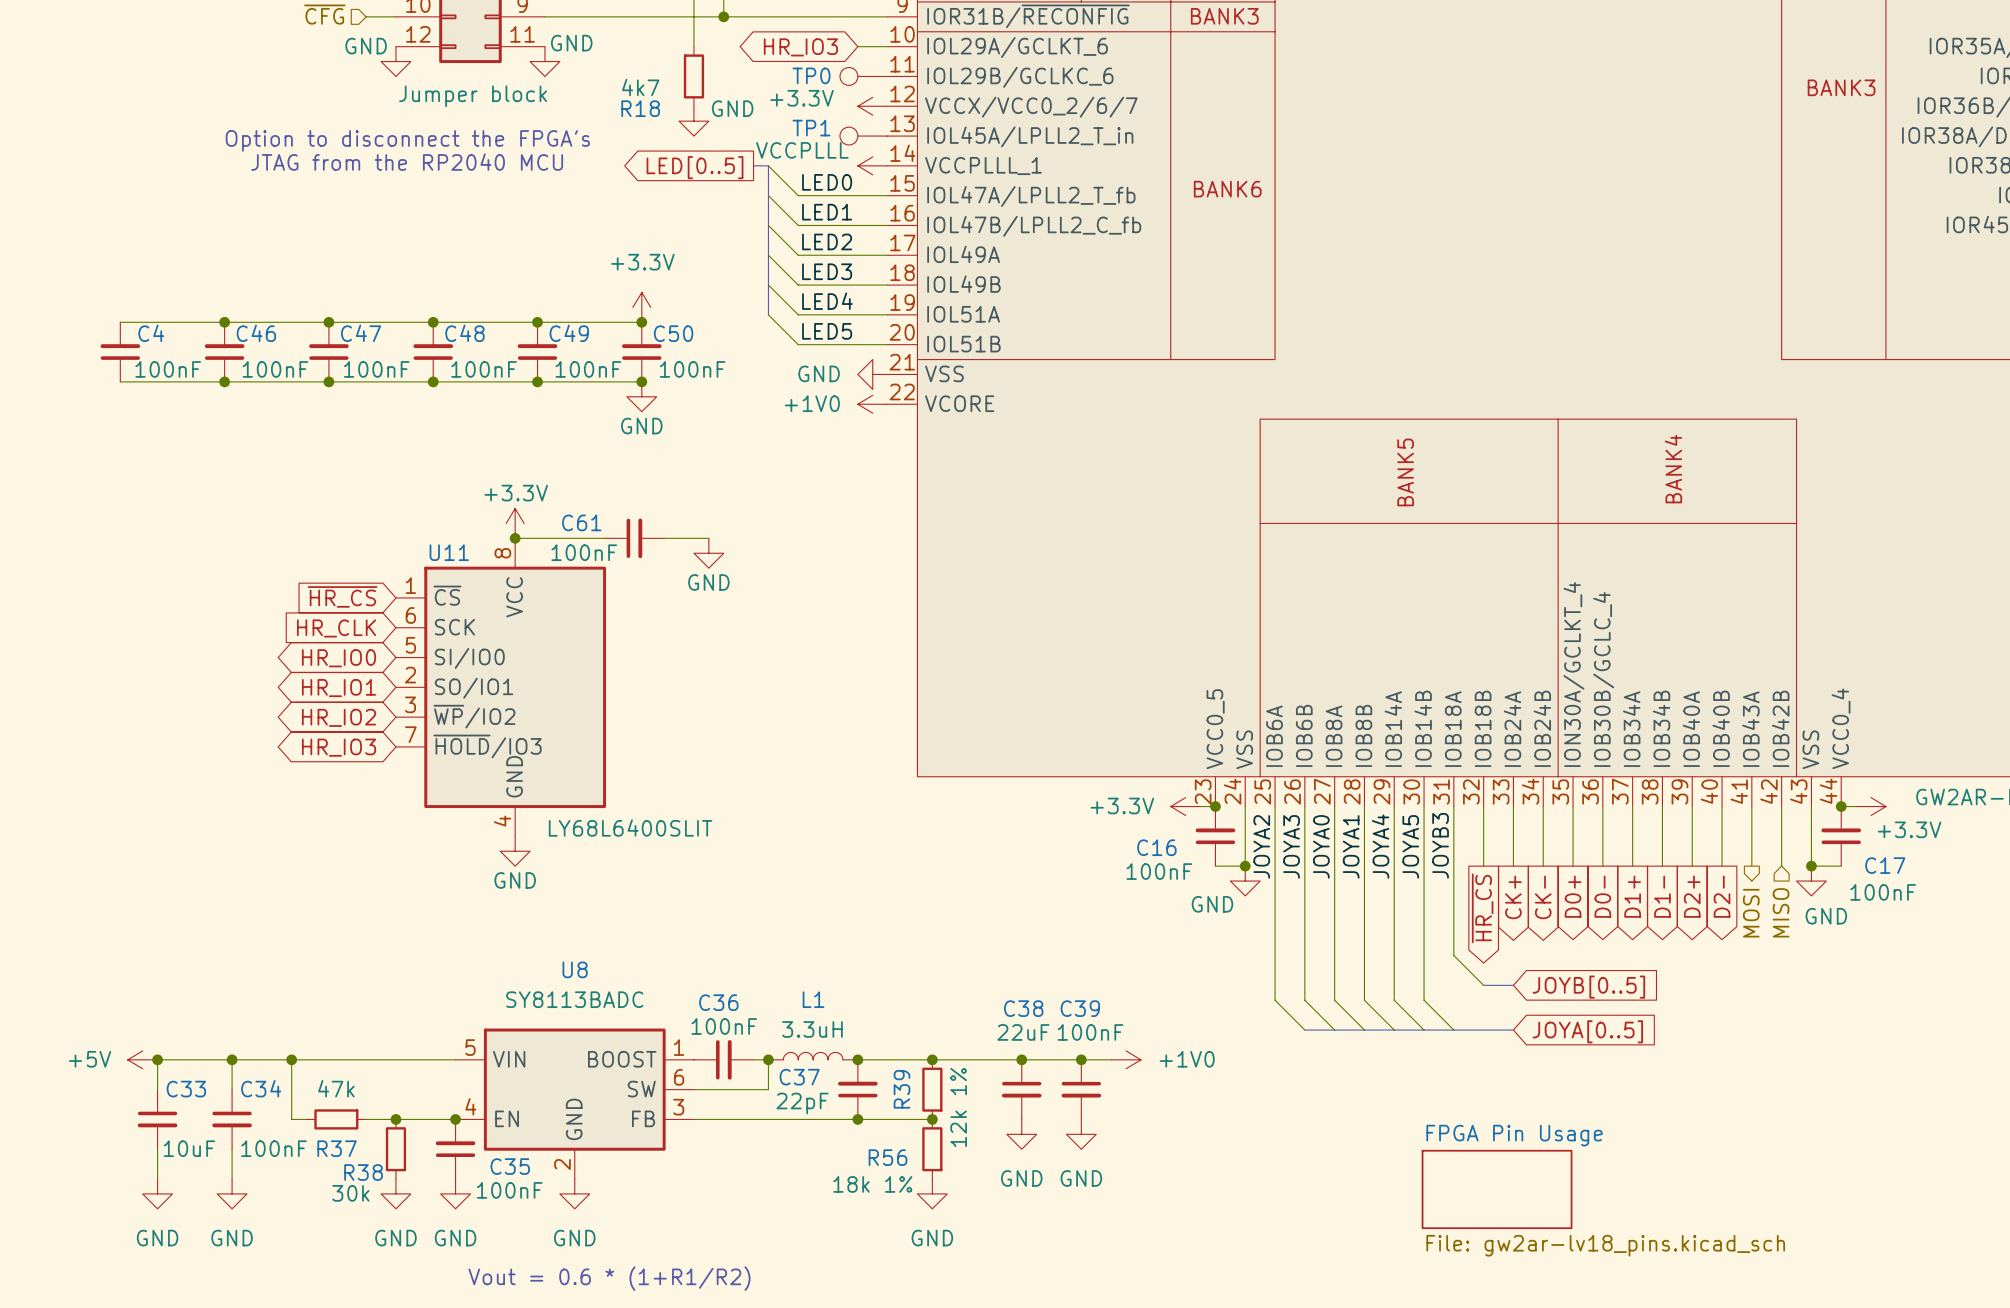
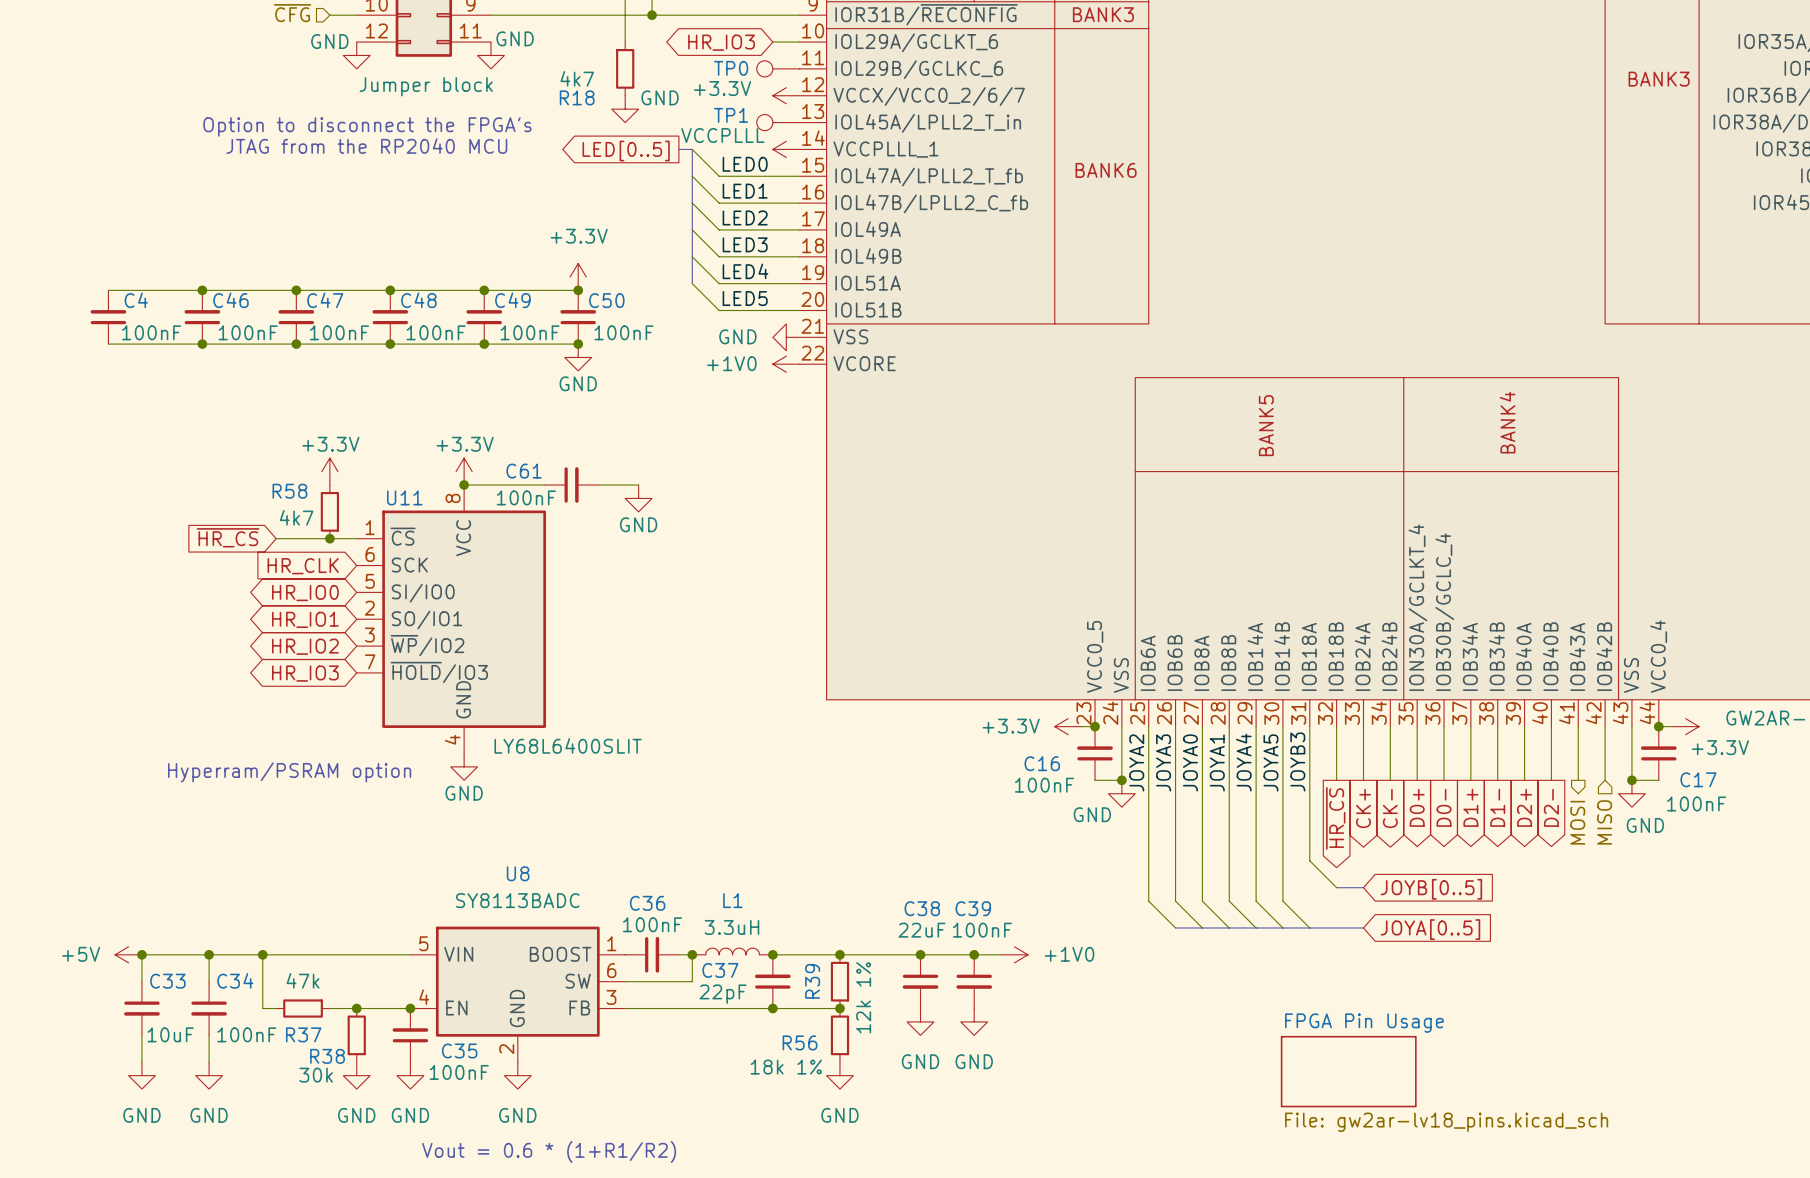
power symbol: none -> +3.3V (329, 471)
R58: none -> 4k7 (329, 511)
global label position: ~{HR_CS} (342, 596) -> ~{HR_CS} (228, 537)
wire: none -> (276, 538) (356, 538)
junction: none -> (329, 538)
text: none -> Hyperram/PSRAM option (289, 772)

